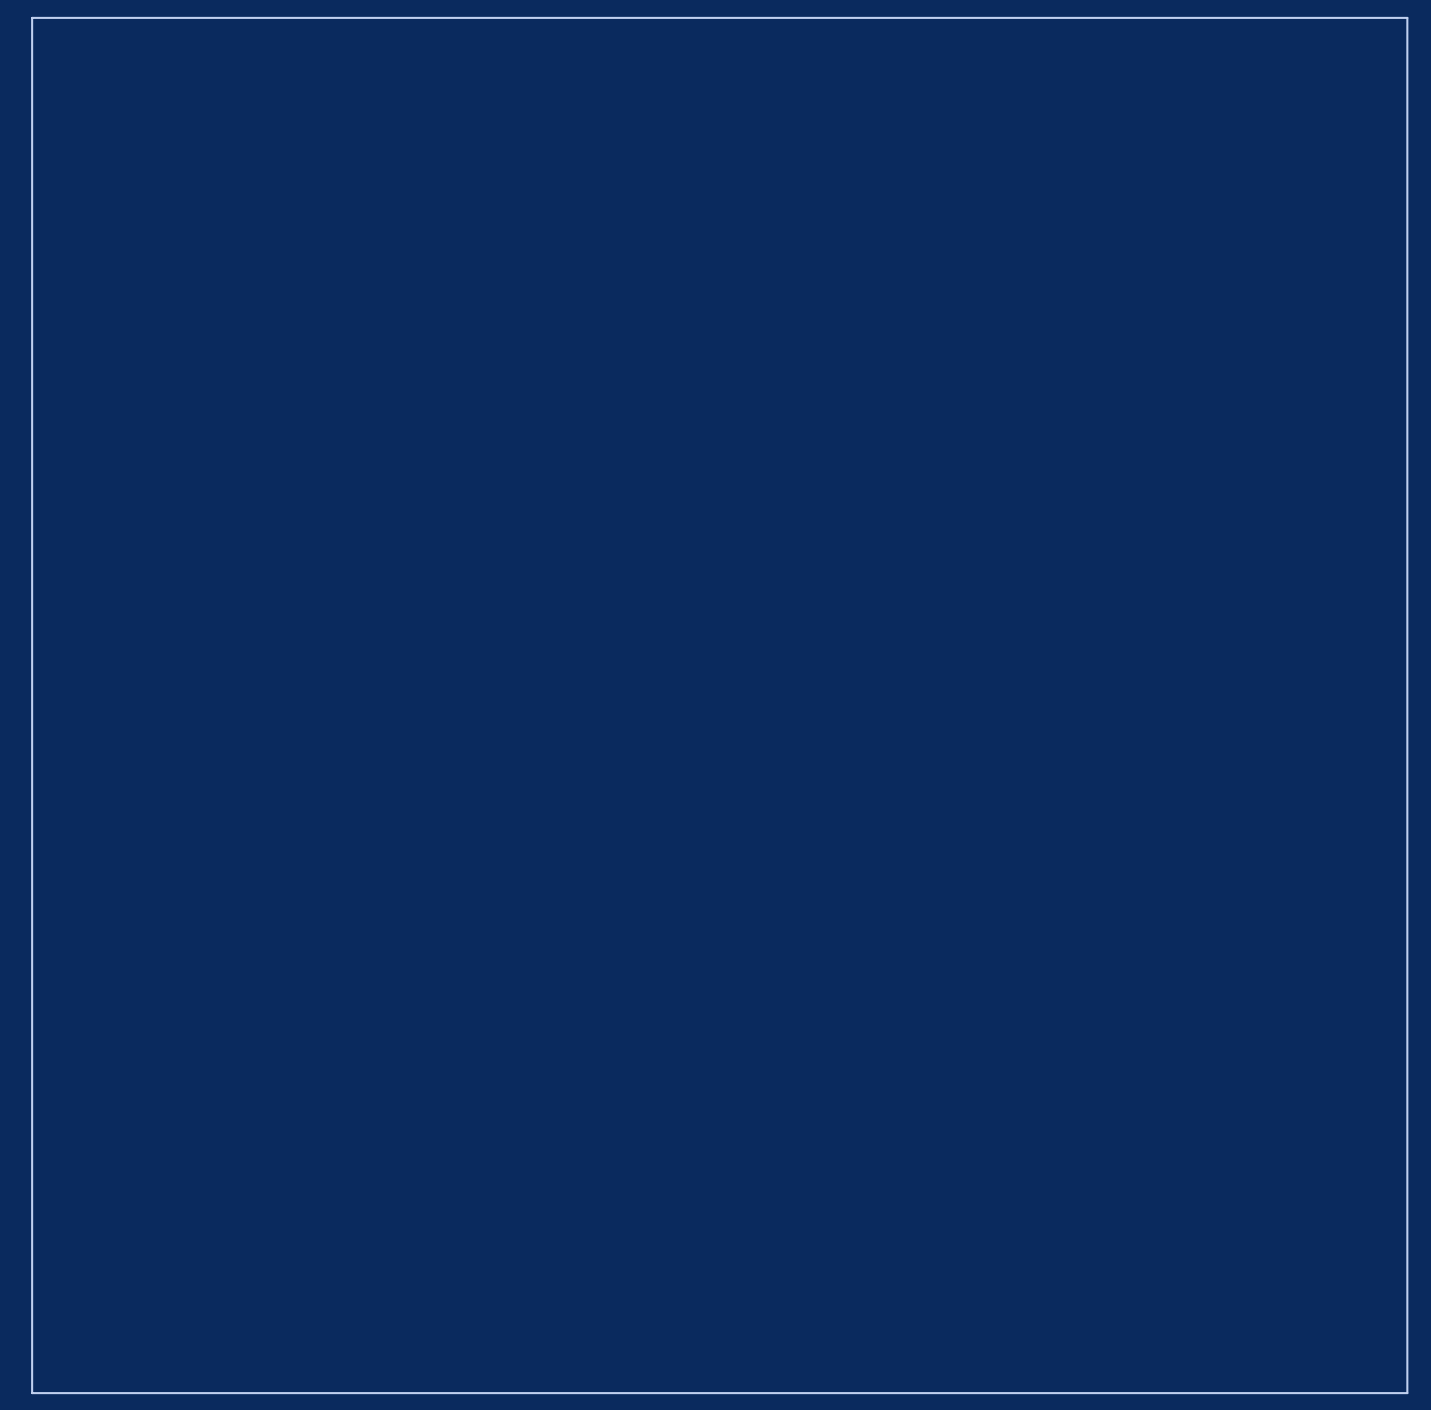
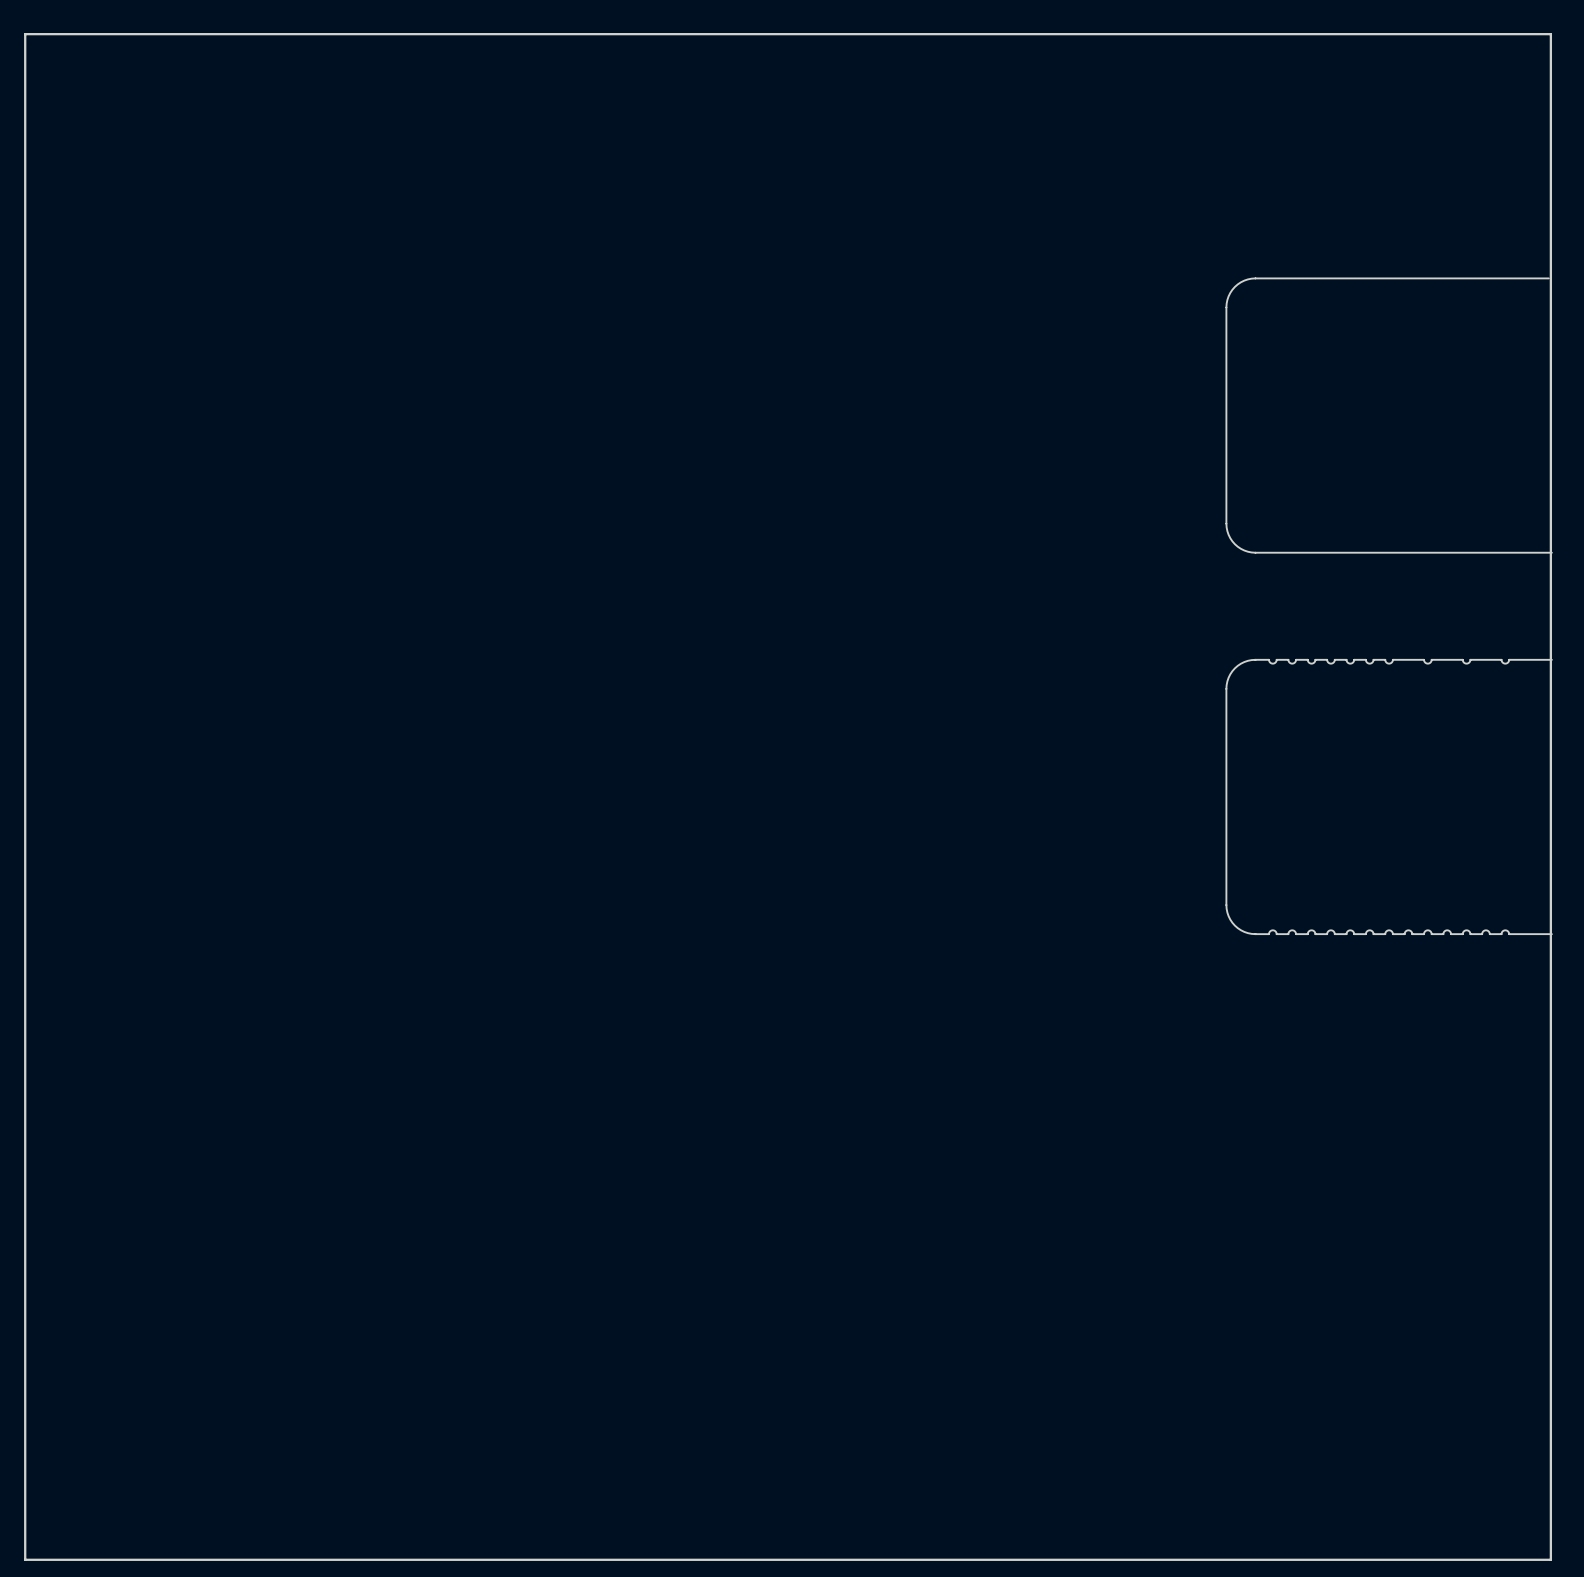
part: none -> (1389, 415)
part: none -> (1389, 796)

